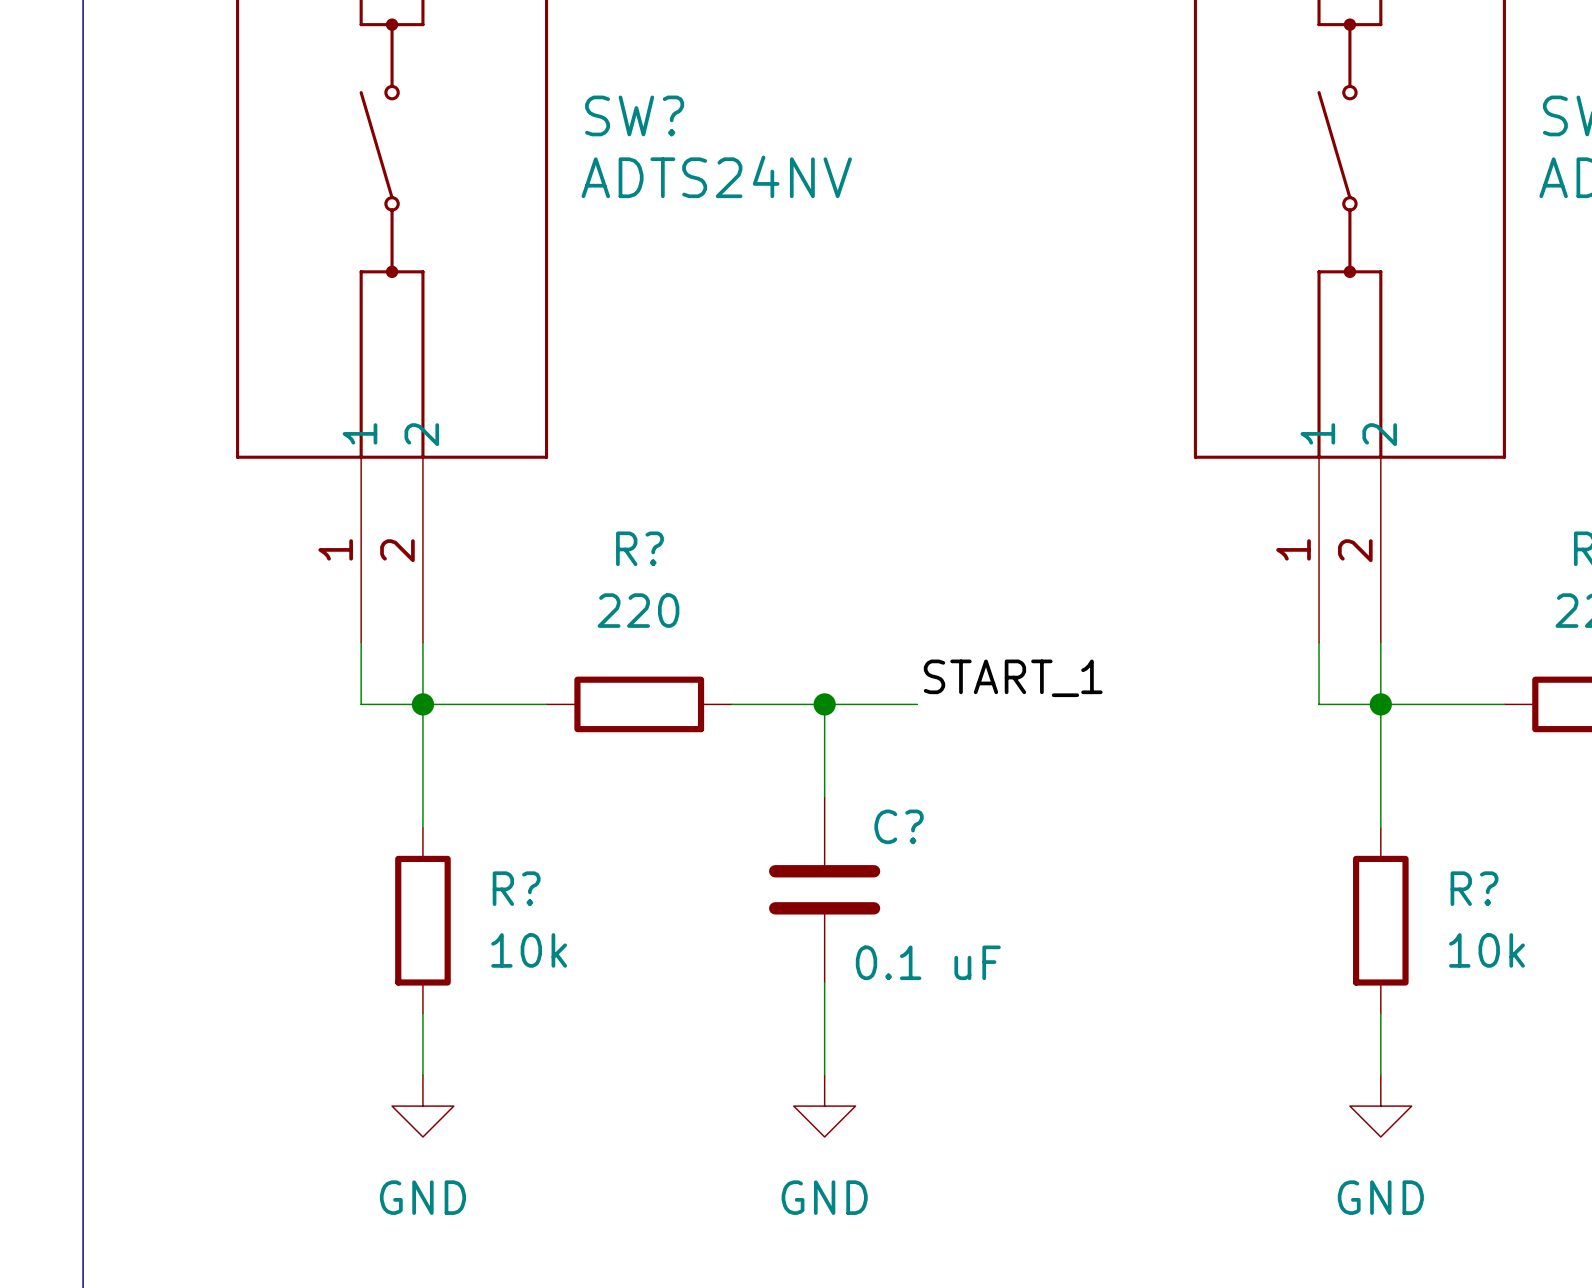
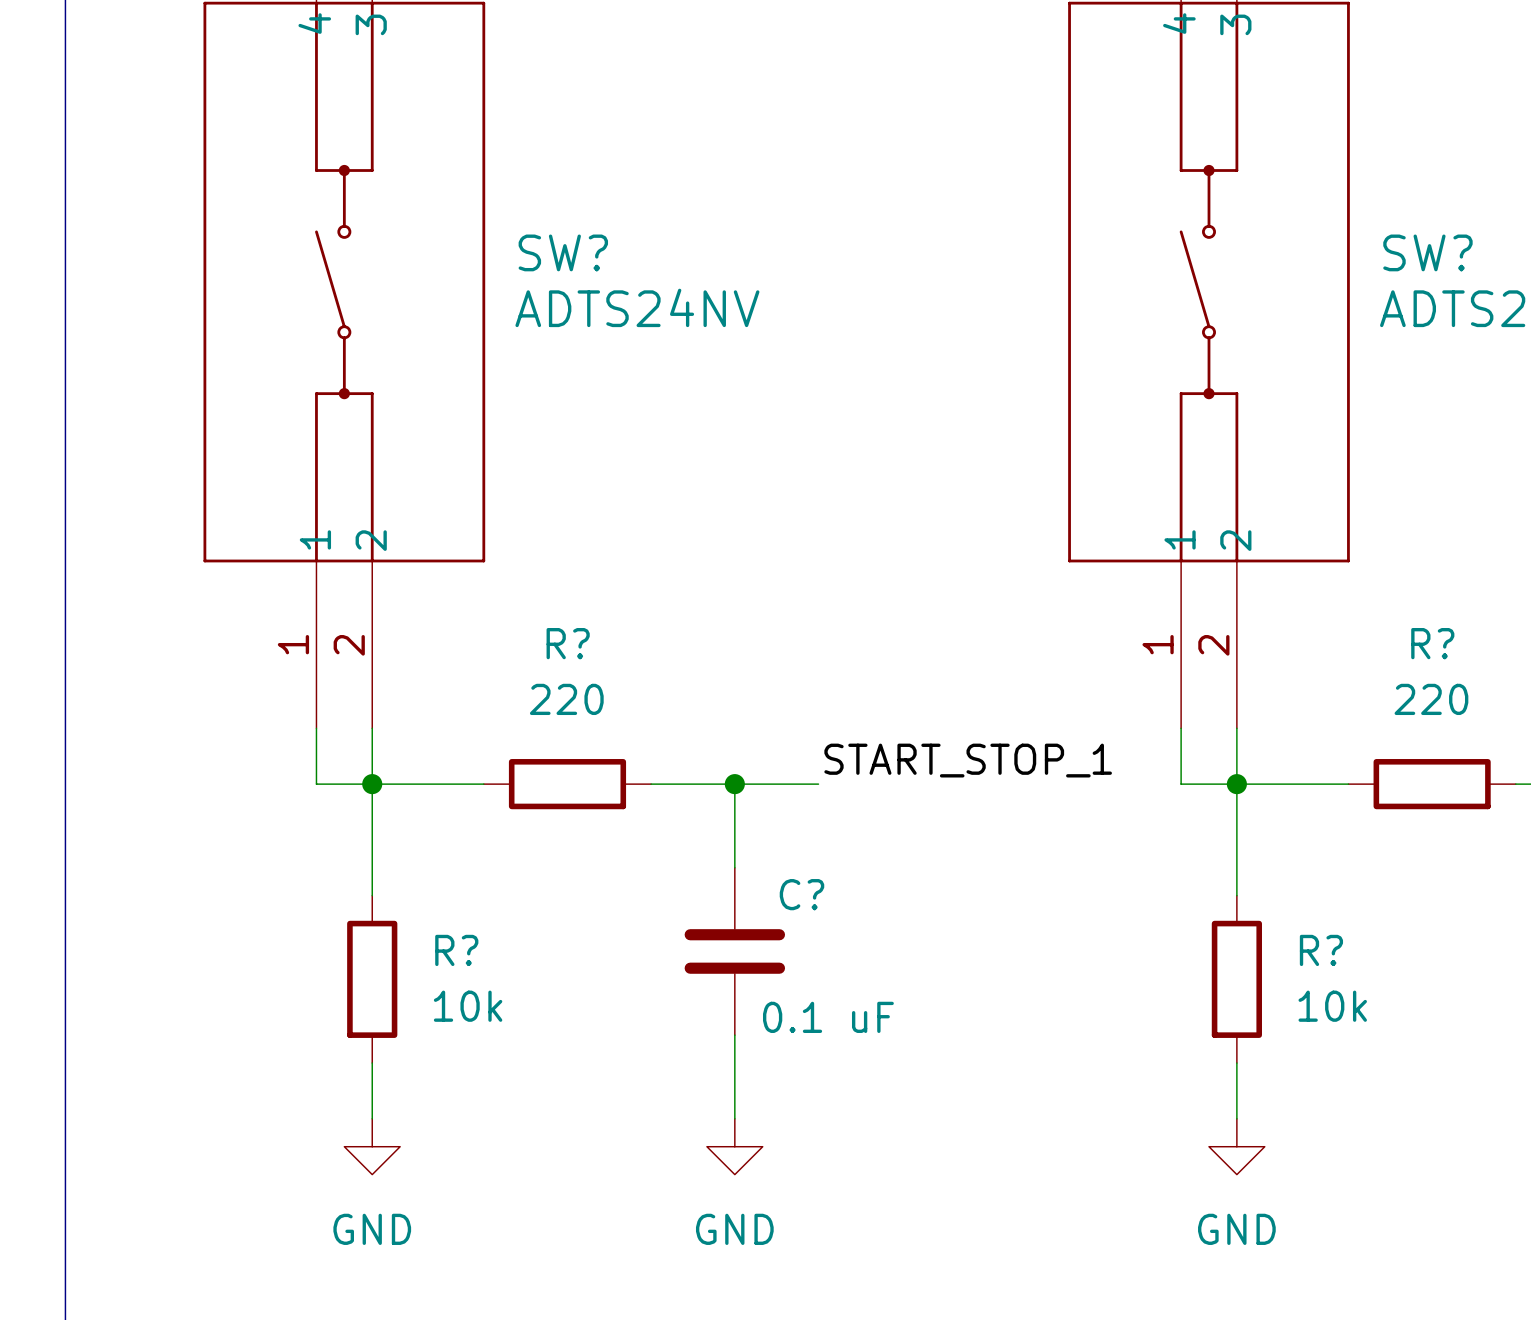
label: START_1 (1013, 678) -> START_STOP_1 (968, 760)

